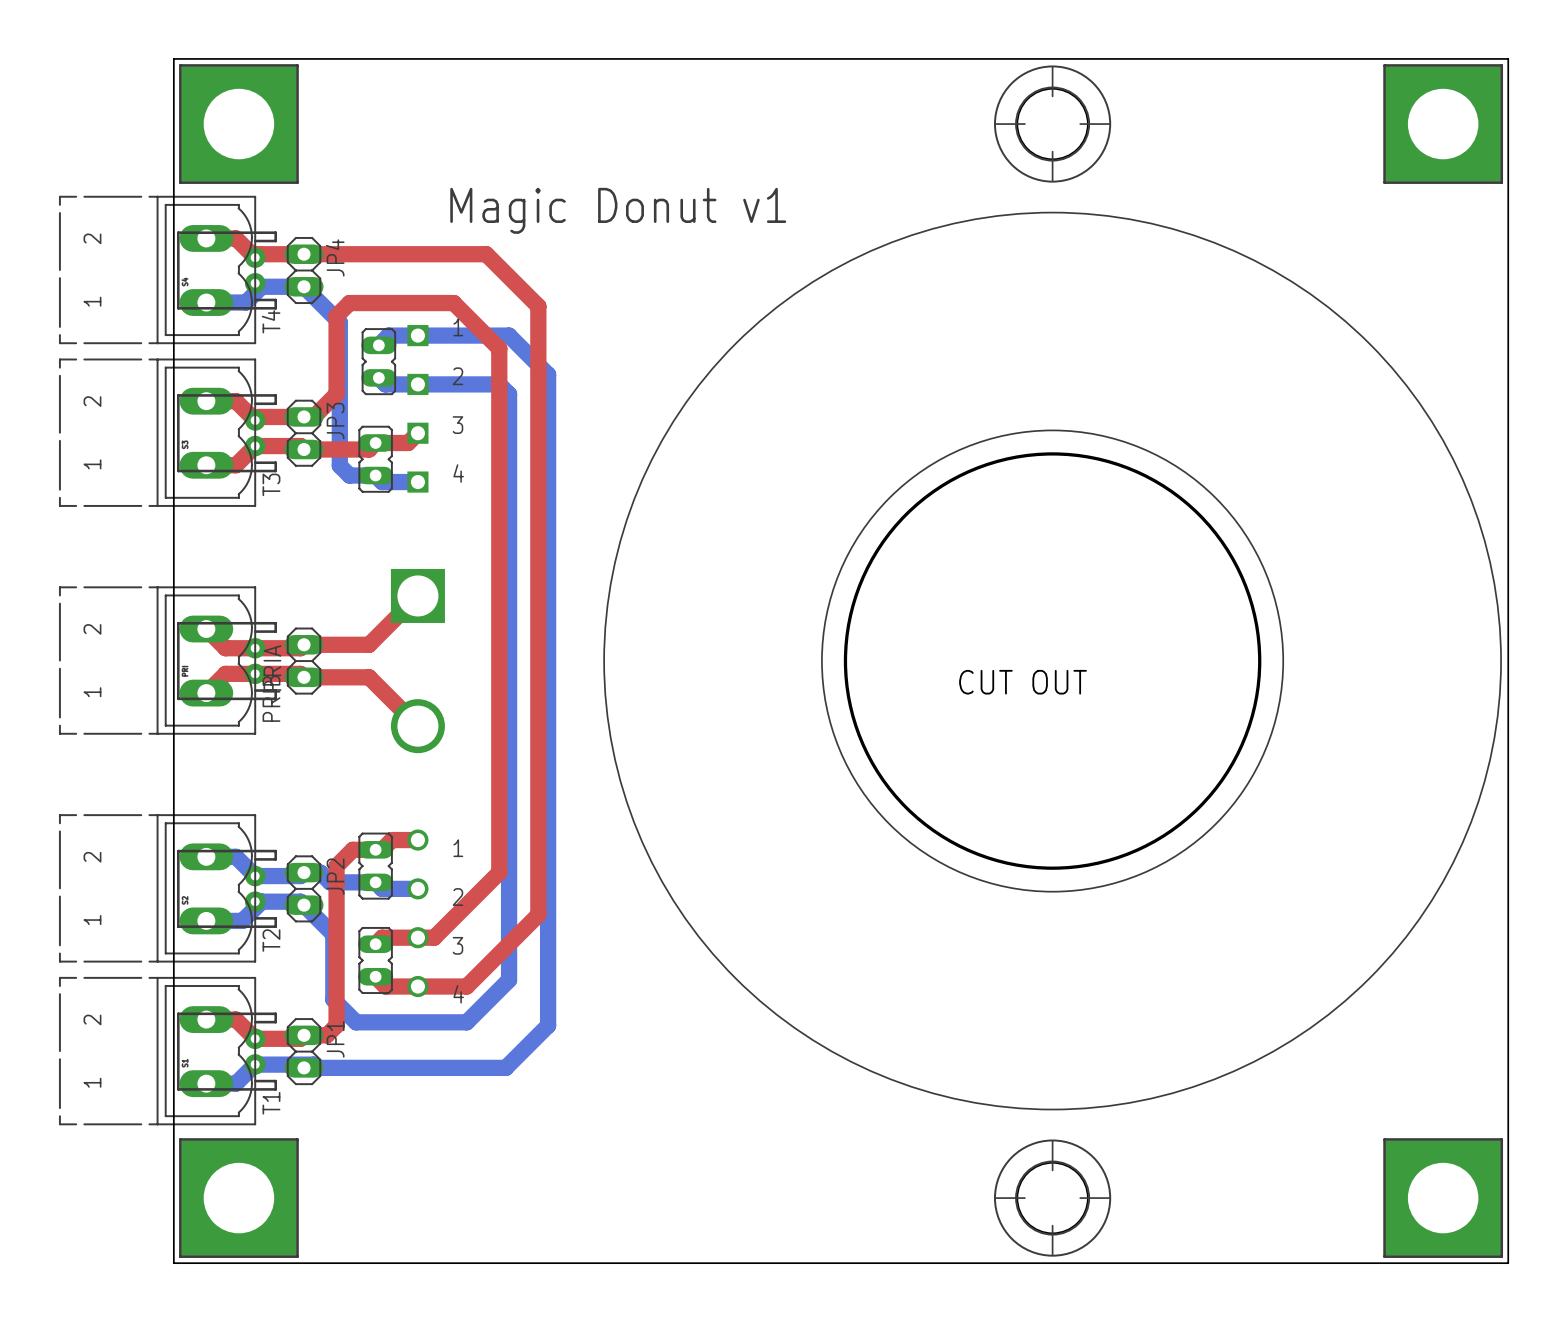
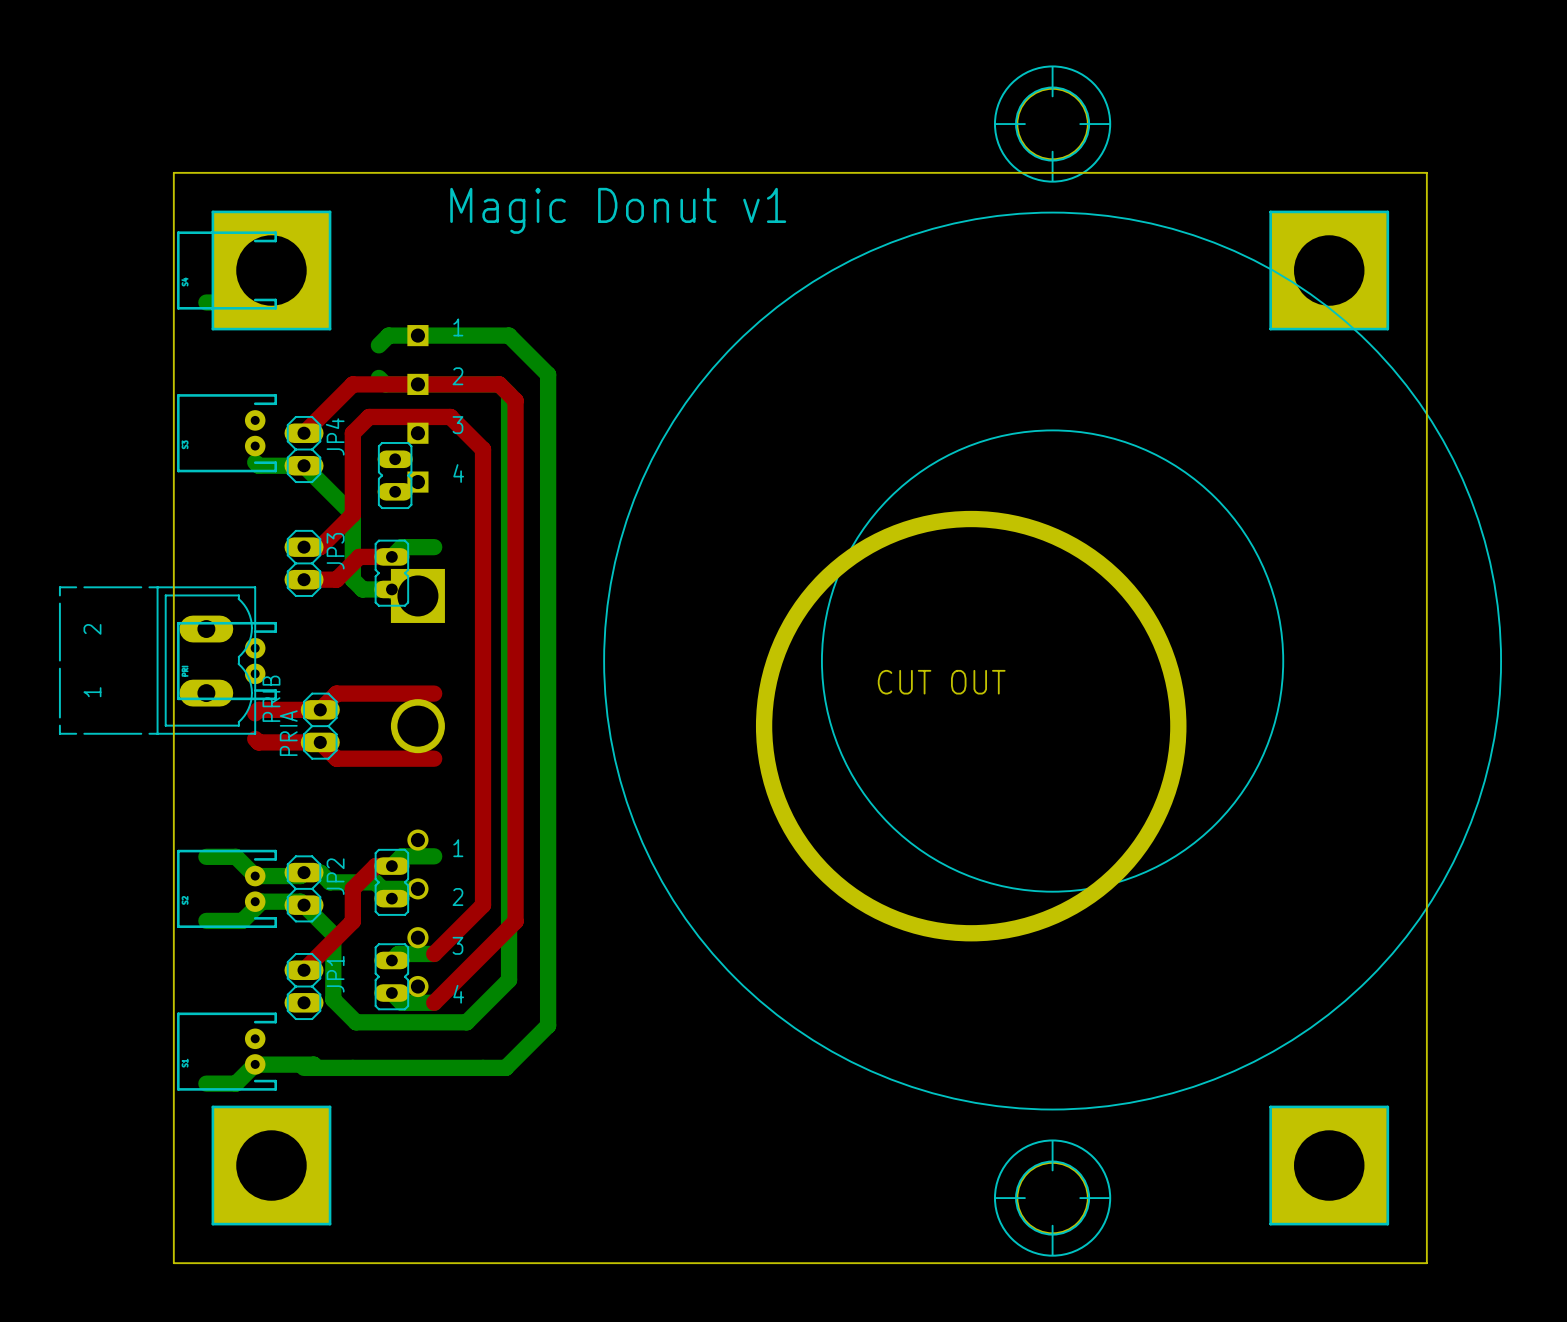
part position: (238, 124) -> (271, 270)
part position: (1443, 124) -> (1329, 270)
board edge: (173, 172) (173, 58) (1508, 58) (1508, 1263) (1426, 1263) -> (173, 172) (1426, 172) (1426, 1263)
top track: (206, 238) (235, 238) (255, 257) (258, 254) (486, 254) (538, 306) (538, 914) (466, 986) (385, 986) (375, 976) -> none
T4: (157, 269) -> none
JP4 position: (304, 270) -> (304, 449)
bottom track: (255, 283) (258, 286) (304, 286) (339, 322) (339, 465) (349, 475) (375, 475) (382, 482) (417, 482) -> none
part: (378, 361) -> none
top track: (206, 401) (235, 401) (255, 420) (258, 416) (313, 416) (336, 394) (336, 316) (349, 303) (453, 303) (499, 348) (499, 872) (434, 937) (382, 937) (375, 944) -> none
T3: (157, 432) -> none
top track: none -> (304, 433) (352, 384) (499, 384) (515, 400) (515, 921) (434, 1002)
JP3 position: (304, 433) -> (304, 563)
top track: (417, 433) (408, 442) (375, 442) (369, 449) (304, 449) (300, 446) (255, 446) (235, 465) (206, 465) -> none
round board edge: [843, 452, 1262, 870] -> none
part position: (375, 459) -> (395, 475)
bottom track: none -> (255, 462) (258, 465) (304, 465) (352, 514) (352, 579) (362, 589) (391, 589) (398, 595) (434, 595)
round board edge: none -> [755, 510, 1187, 942]
top track: none -> (304, 547) (320, 547) (352, 514) (352, 433) (369, 416) (450, 416) (483, 449) (483, 905) (434, 953)
bottom track: none -> (434, 547) (401, 547) (391, 556)
top track: none -> (391, 556) (359, 556) (336, 579) (304, 579)
part: none -> (391, 573)
top track: (417, 595) (369, 644) (304, 644) (300, 648) (225, 648) (206, 629) -> none
PRIA position: (304, 661) -> (320, 726)
text position: CUT OUT (1023, 682) -> CUT OUT (941, 682)
top track: (206, 693) (225, 673) (300, 673) (304, 677) (369, 677) (417, 726) -> none
top track: none -> (434, 693) (336, 693) (320, 709) (258, 709) (255, 713)
top track: none -> (255, 738) (258, 742) (320, 742) (336, 758) (434, 758)
top track: (417, 840) (391, 840) (382, 849) (352, 849) (336, 866) (336, 1025) (326, 1035) (304, 1035) (300, 1038) (255, 1038) (235, 1019) (206, 1019) -> none
bottom track: none -> (434, 856) (401, 856) (391, 866)
part position: (375, 866) -> (391, 882)
top track: none -> (391, 866) (375, 866) (352, 888) (352, 921) (304, 970)
T2: (157, 888) -> none
bottom track: none -> (434, 953) (398, 953) (391, 960)
part position: (375, 960) -> (391, 976)
bottom track: none -> (391, 993) (401, 1002) (434, 1002)
T1: (157, 1051) -> none
JP1 position: (304, 1051) -> (304, 986)
part position: (238, 1198) -> (271, 1165)
part position: (1443, 1198) -> (1329, 1165)

